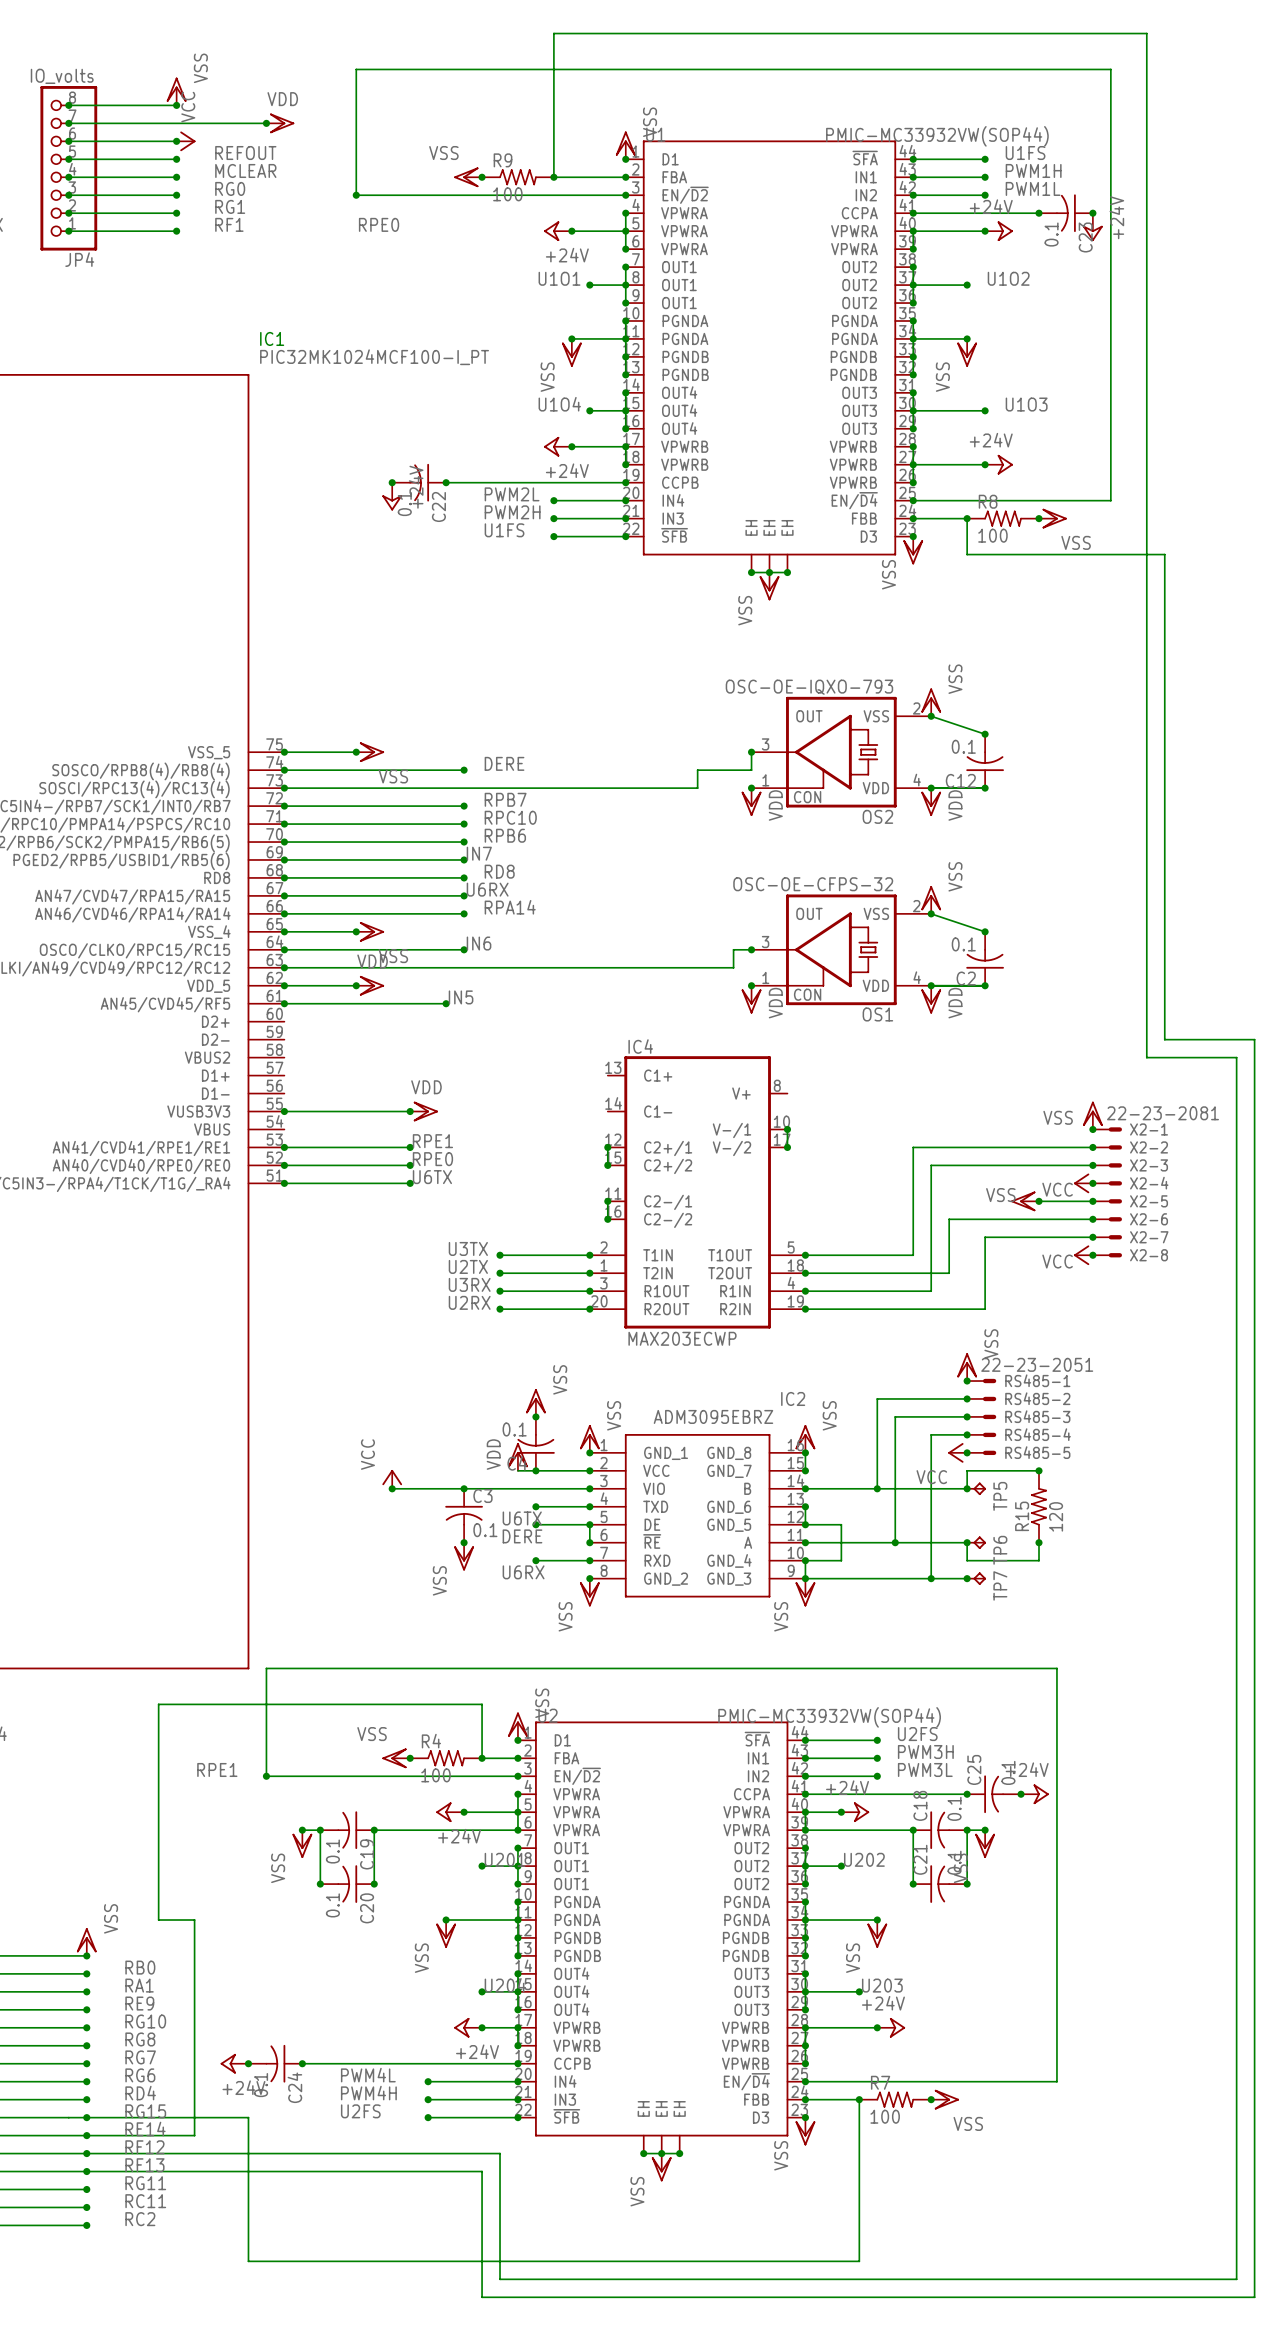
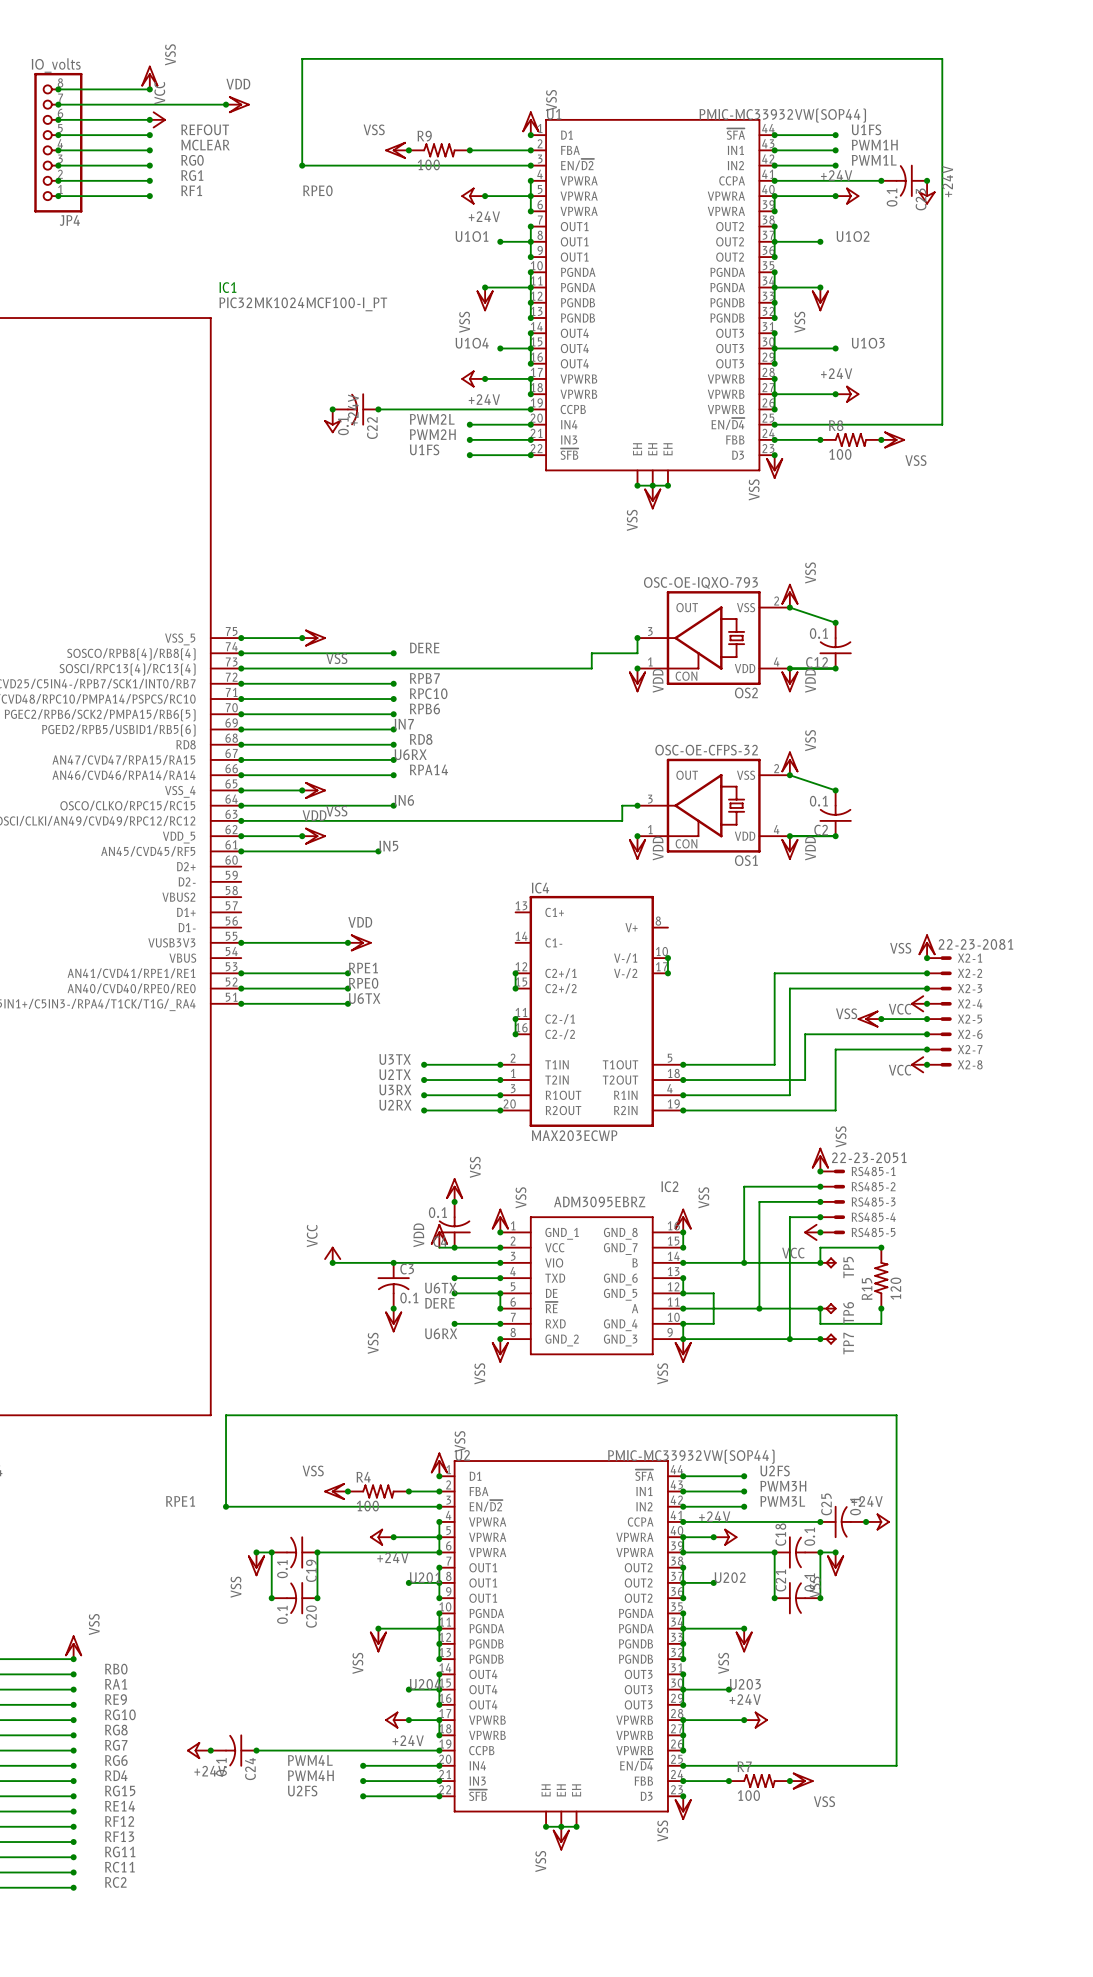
wire: (553, 177) (553, 33) (1146, 33) (1146, 1057) (1236, 1057) (1236, 2279) (500, 2279) (500, 2153) (86, 2153) -> none
wire: (967, 518) (967, 554) (1164, 554) (1164, 1039) (1254, 1039) (1254, 2297) (482, 2297) (482, 2171) (86, 2171) -> none
wire: (482, 1758) (482, 1704) (158, 1704) (158, 1920) (194, 1920) (194, 2135) (86, 2135) -> none
wire: (859, 2099) (859, 2261) (248, 2261) (248, 2117) (86, 2117) -> none

